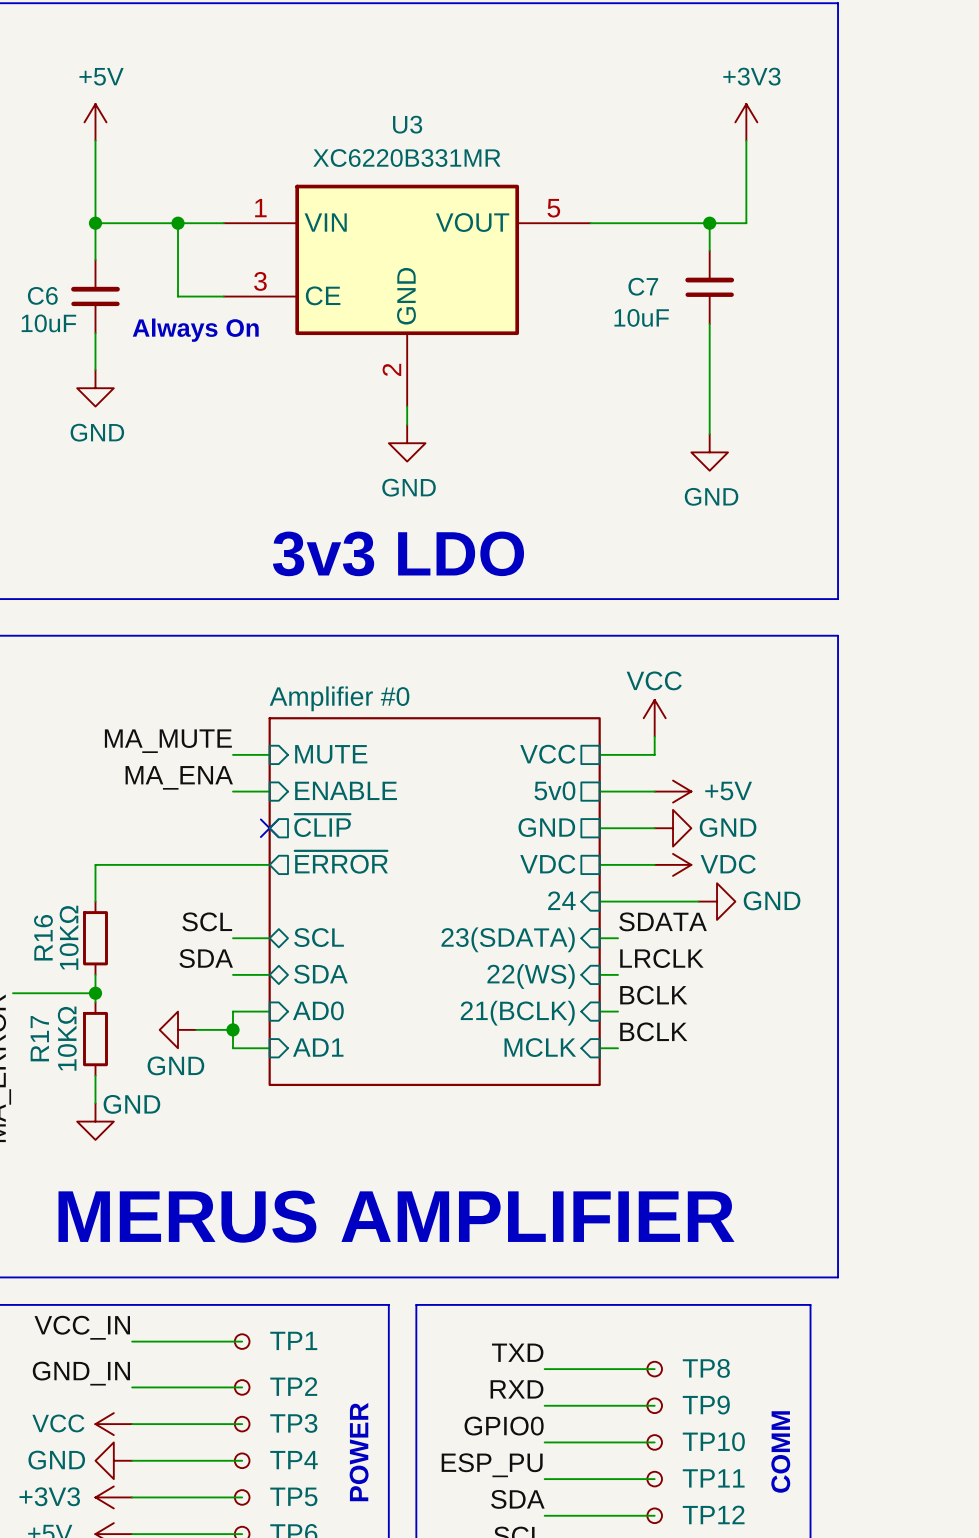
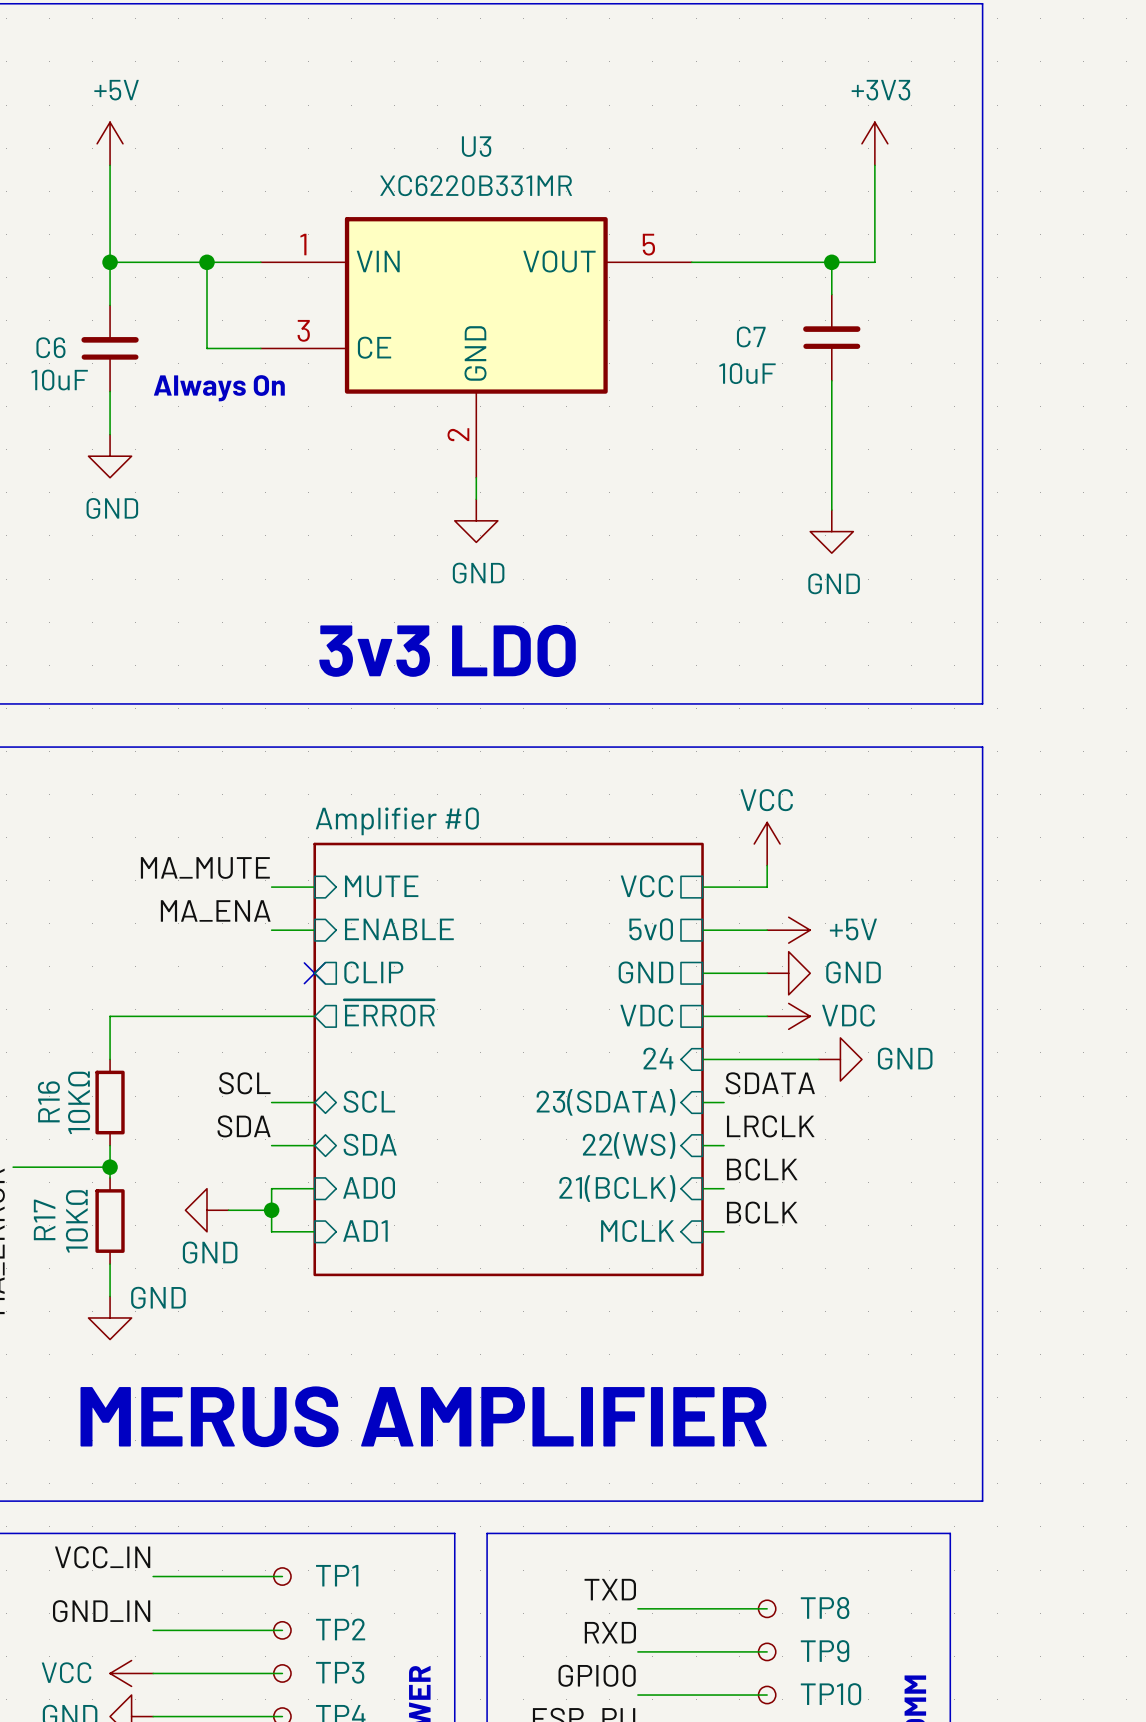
sheet pin: ~{CLIP} (322, 825) -> CLIP (373, 972)
text position: MERUS AMPLIFIER (396, 1216) -> MERUS AMPLIFIER (423, 1416)

